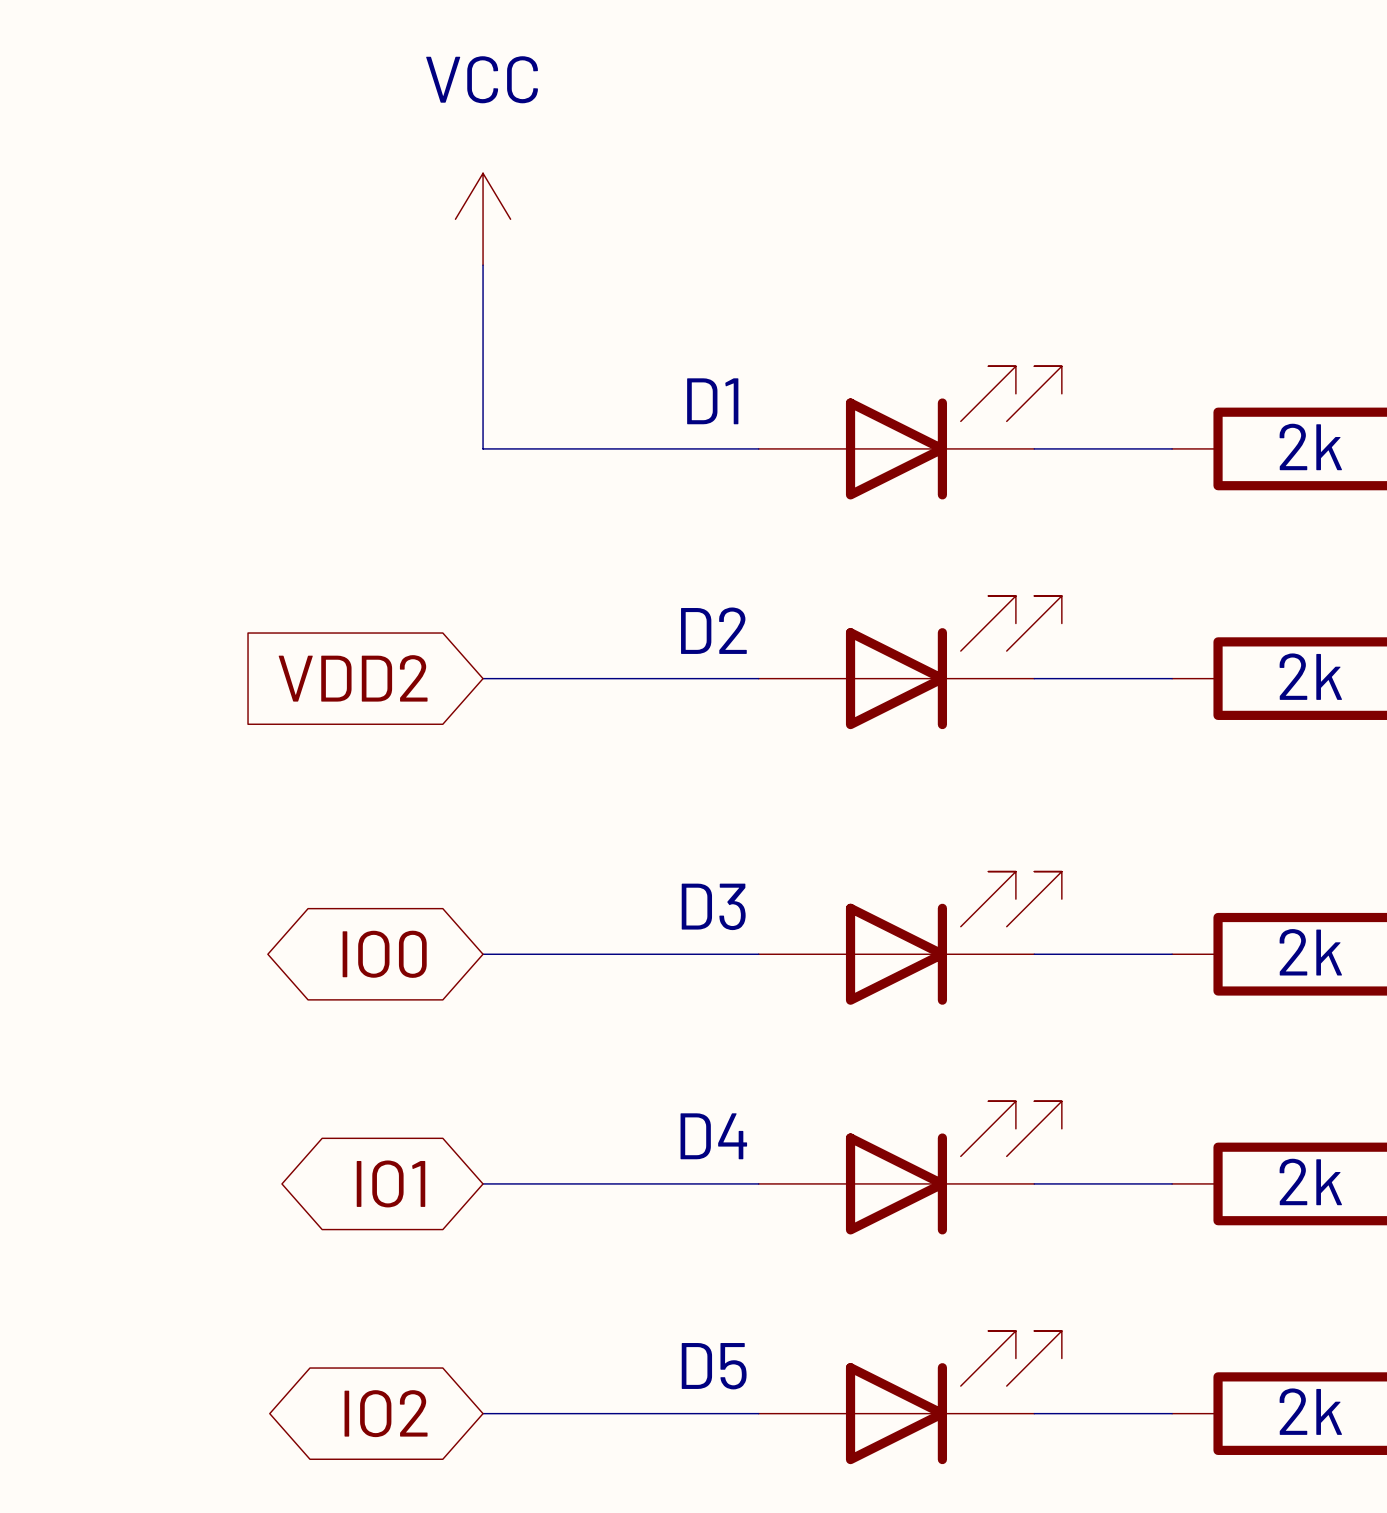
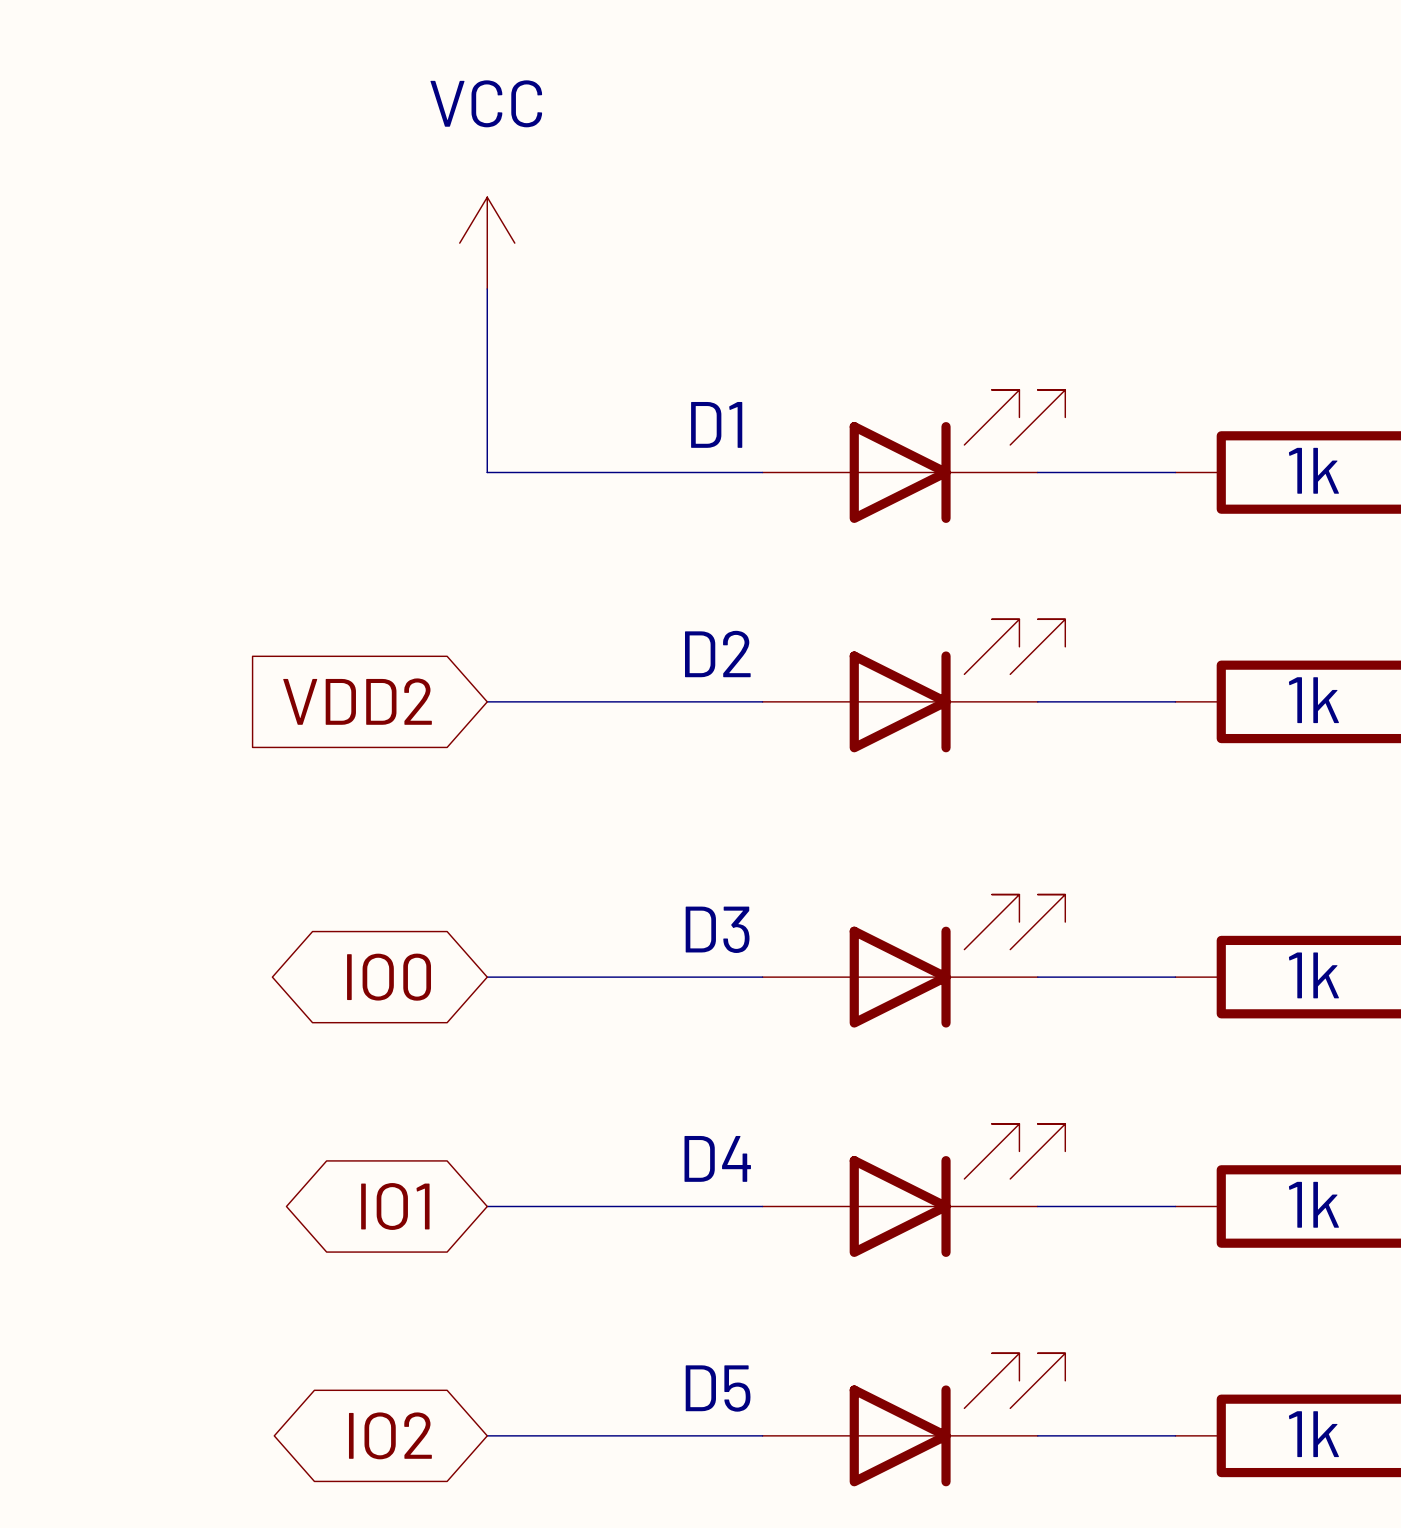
part value: 2k (1310, 446) -> 1k (1313, 470)
part value: 2k (1310, 676) -> 1k (1313, 700)
part value: 2k (1310, 952) -> 1k (1313, 975)
part value: 2k (1310, 1181) -> 1k (1313, 1204)
part value: 2k (1310, 1411) -> 1k (1313, 1434)

